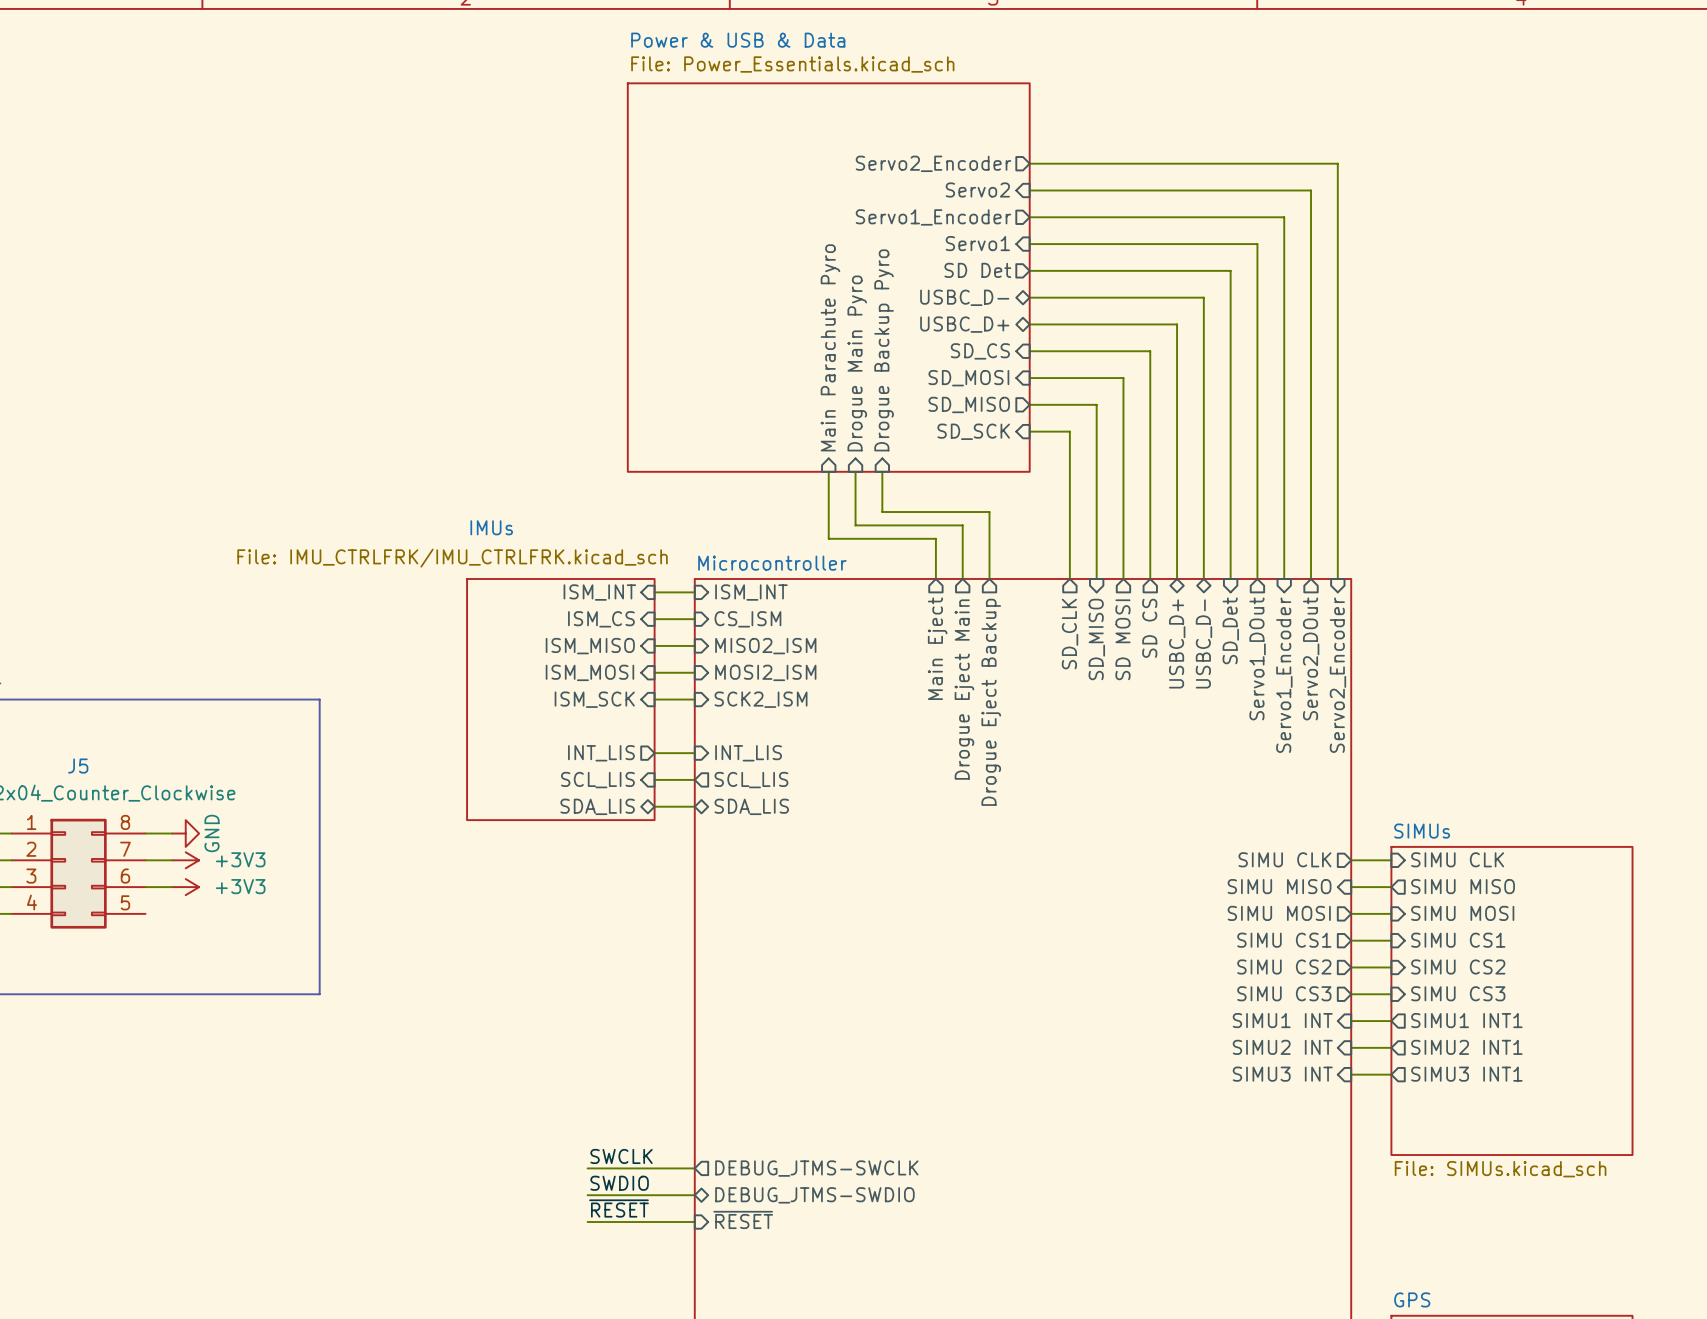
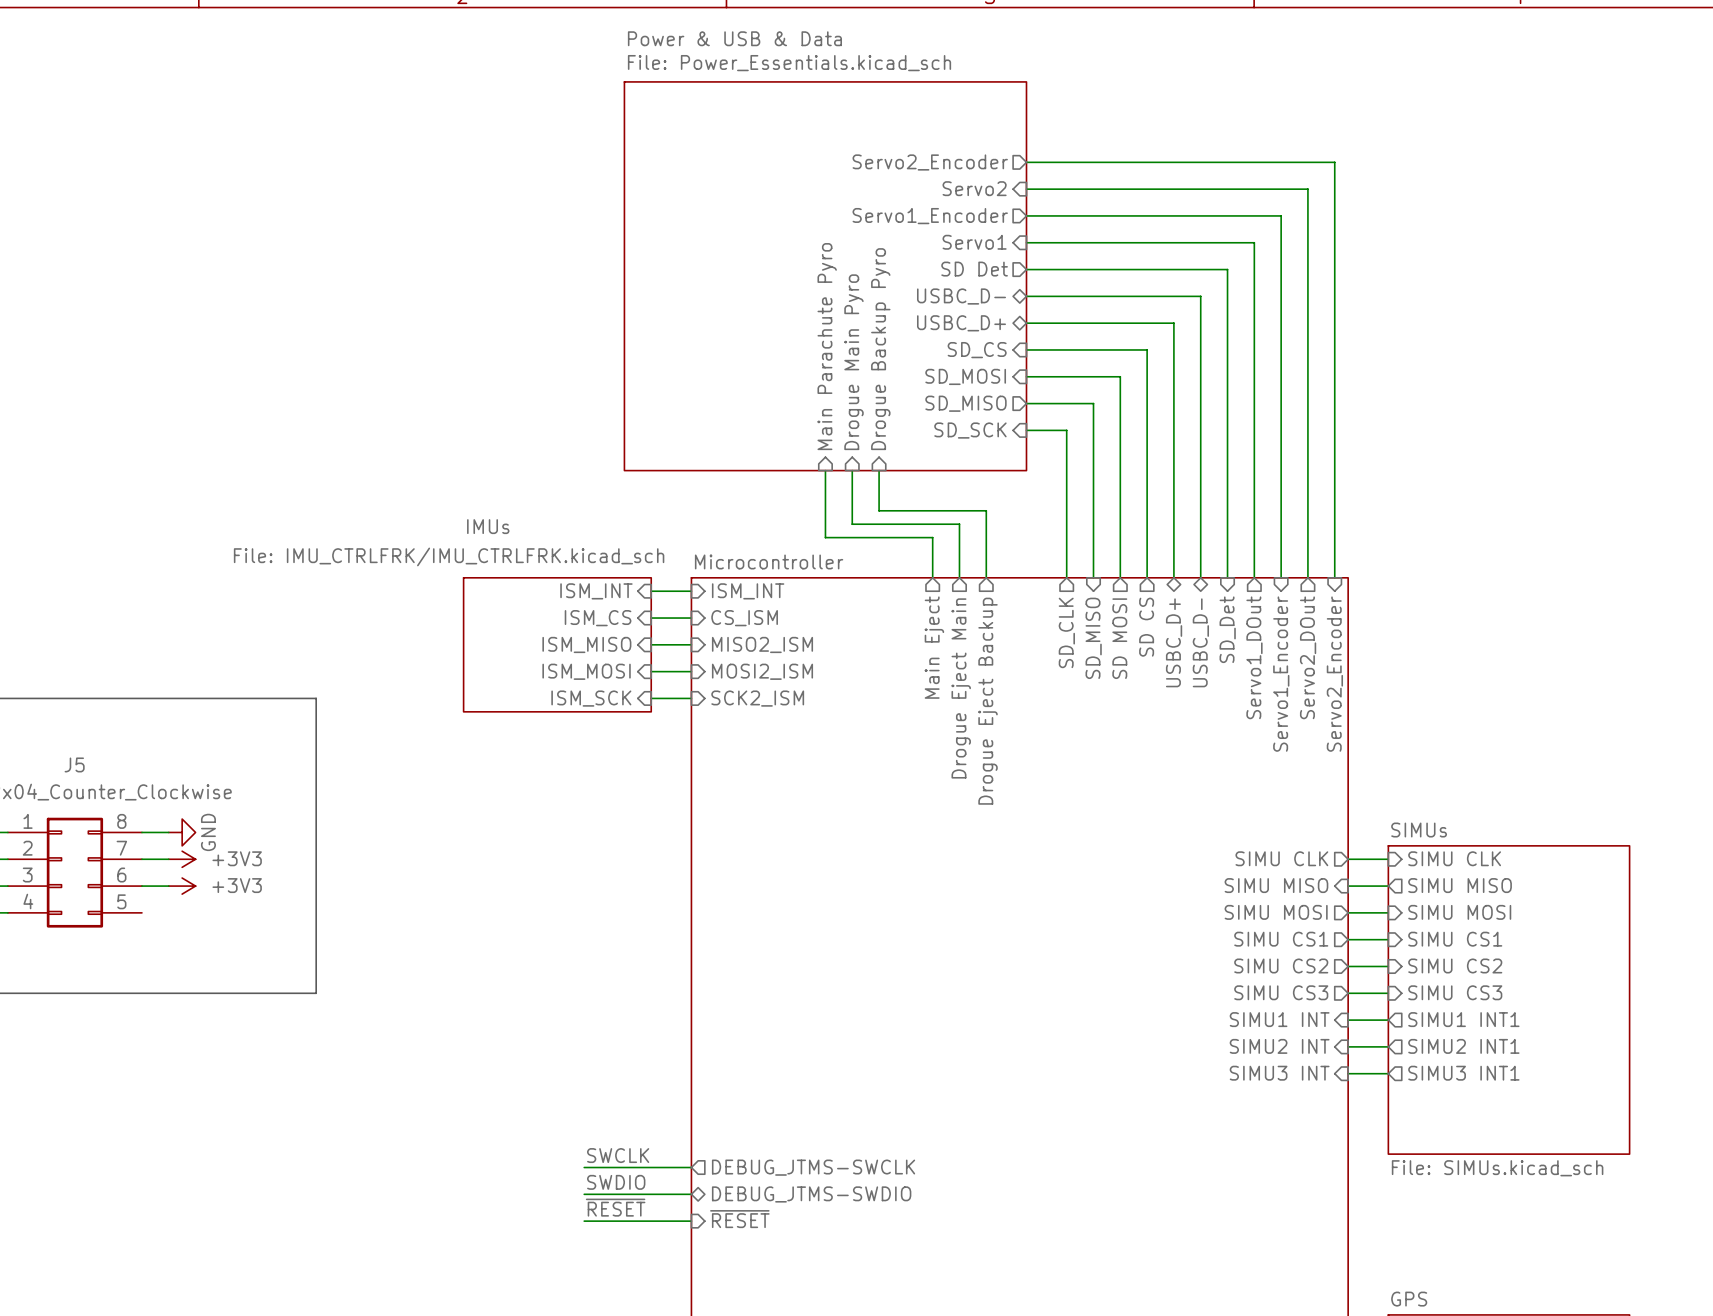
sheet IMUs: none -> File: IMU_CTRLFRK/IMU_CTRLFRK.kicad_sch (557, 644)
sheet IMUs: File: IMU_CTRLFRK/IMU_CTRLFRK.kicad_sch (560, 699) -> none
sheet pin: INT_LIS (601, 753) -> none
wire: (654, 753) (694, 753) -> none
sheet pin: INT_LIS (748, 753) -> none
wire: (654, 779) (694, 779) -> none
sheet pin: SCL_LIS (597, 780) -> none
sheet pin: SCL_LIS (751, 780) -> none
sheet pin: SDA_LIS (597, 806) -> none
wire: (654, 806) (694, 806) -> none
sheet pin: SDA_LIS (751, 806) -> none

